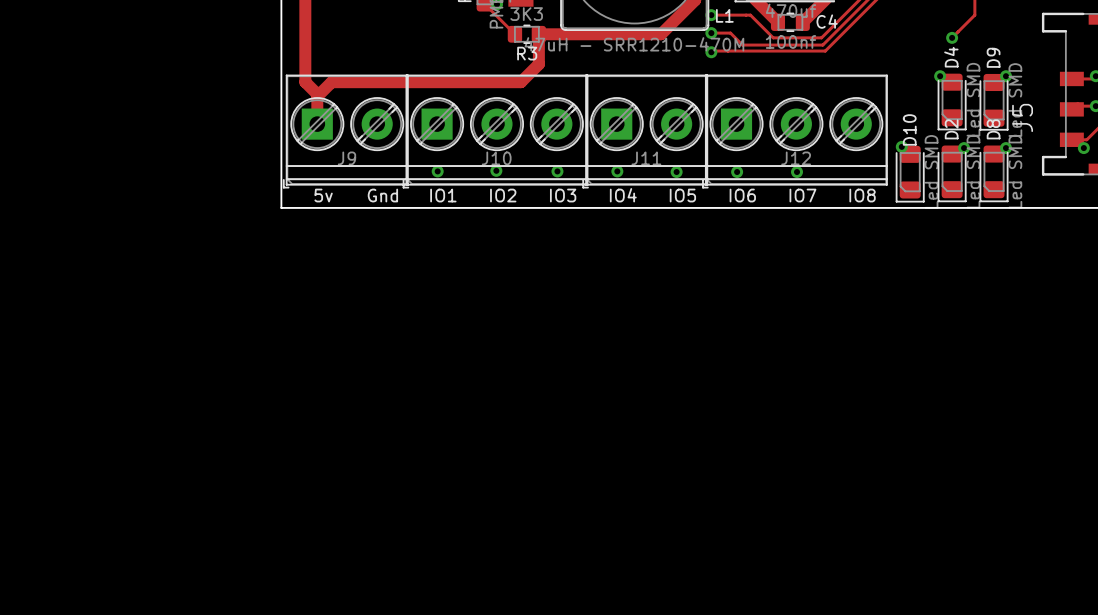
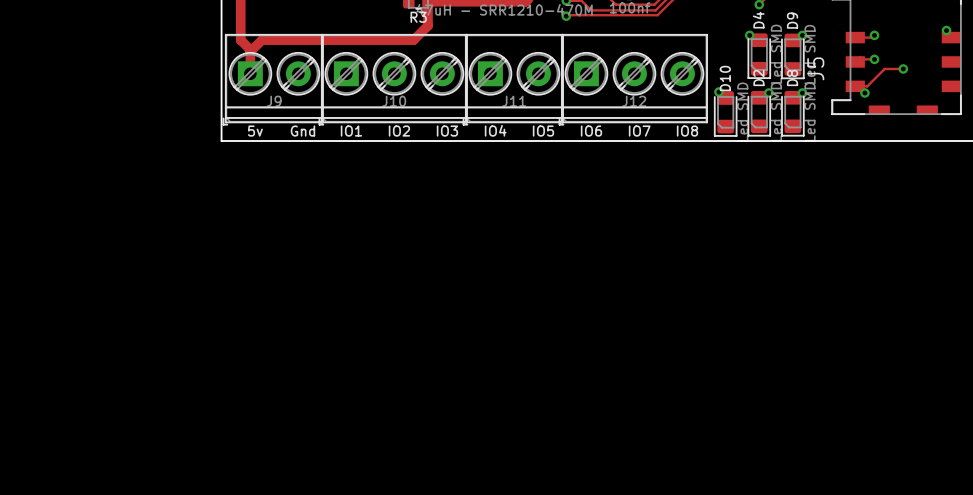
via: (496, 170) -> none
via: (437, 171) -> none
via: (557, 171) -> none
via: (617, 171) -> none
via: (676, 172) -> none
via: (737, 172) -> none
via: (797, 172) -> none

